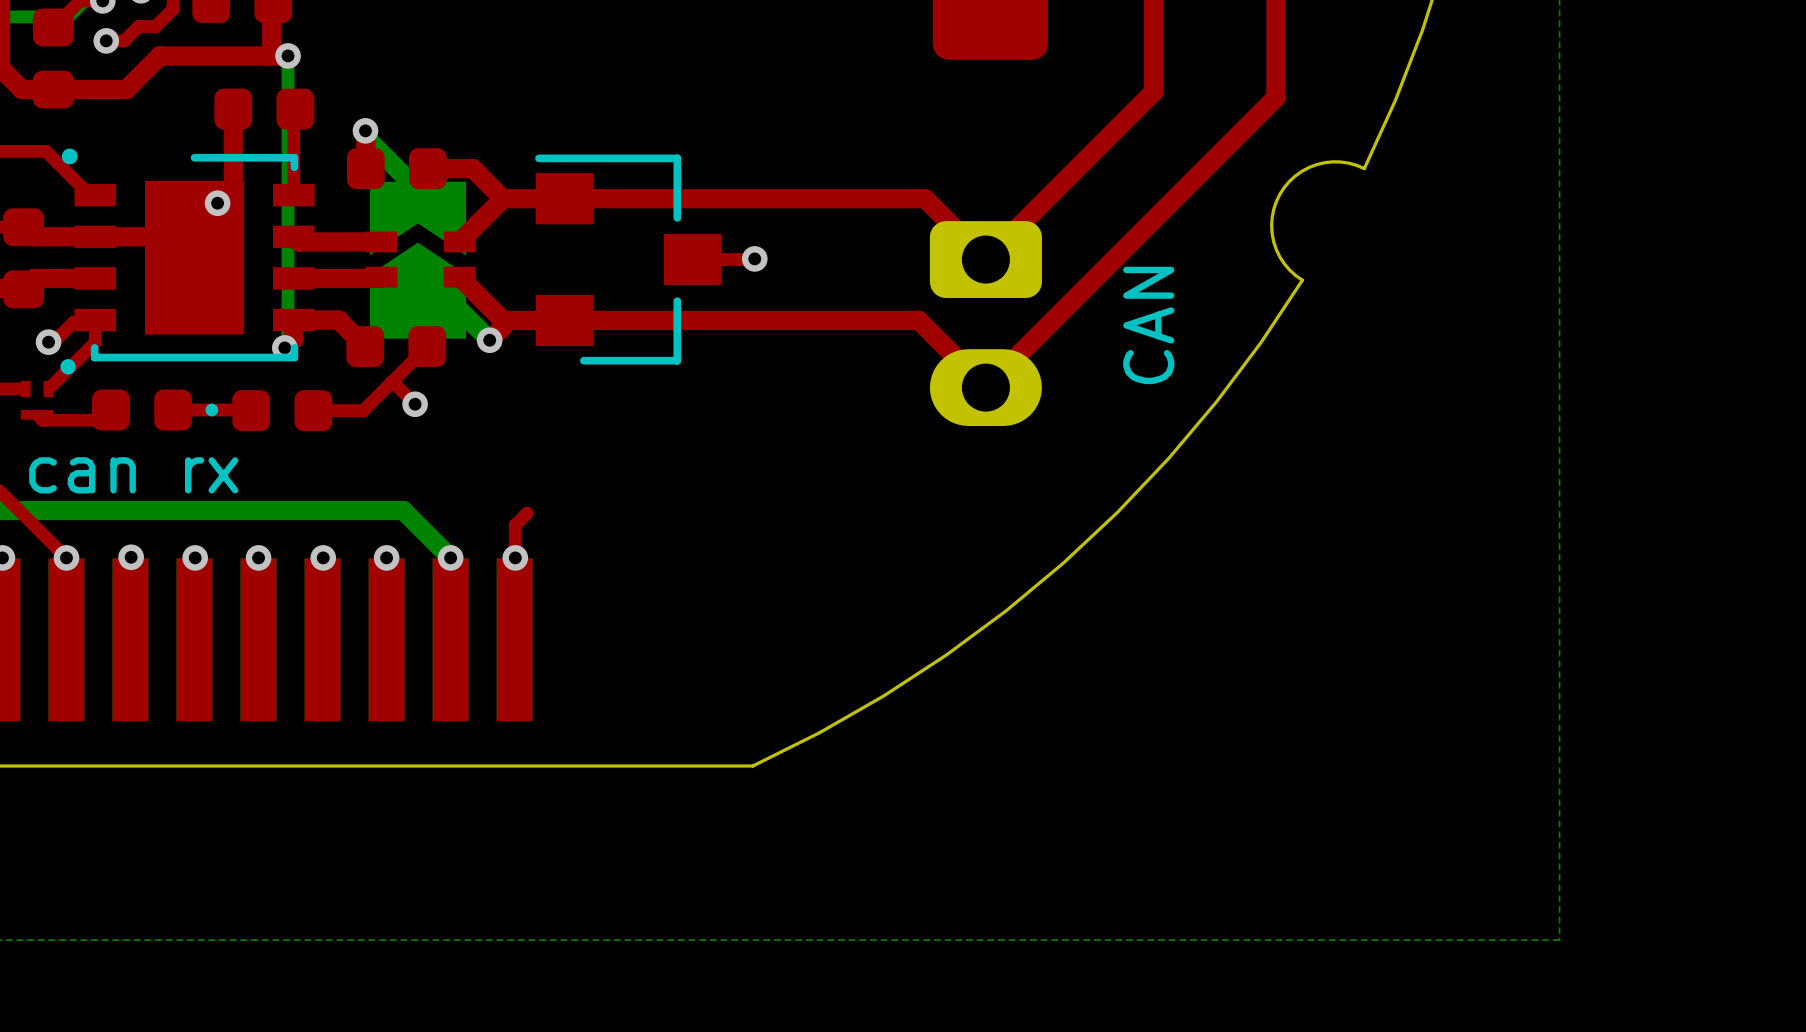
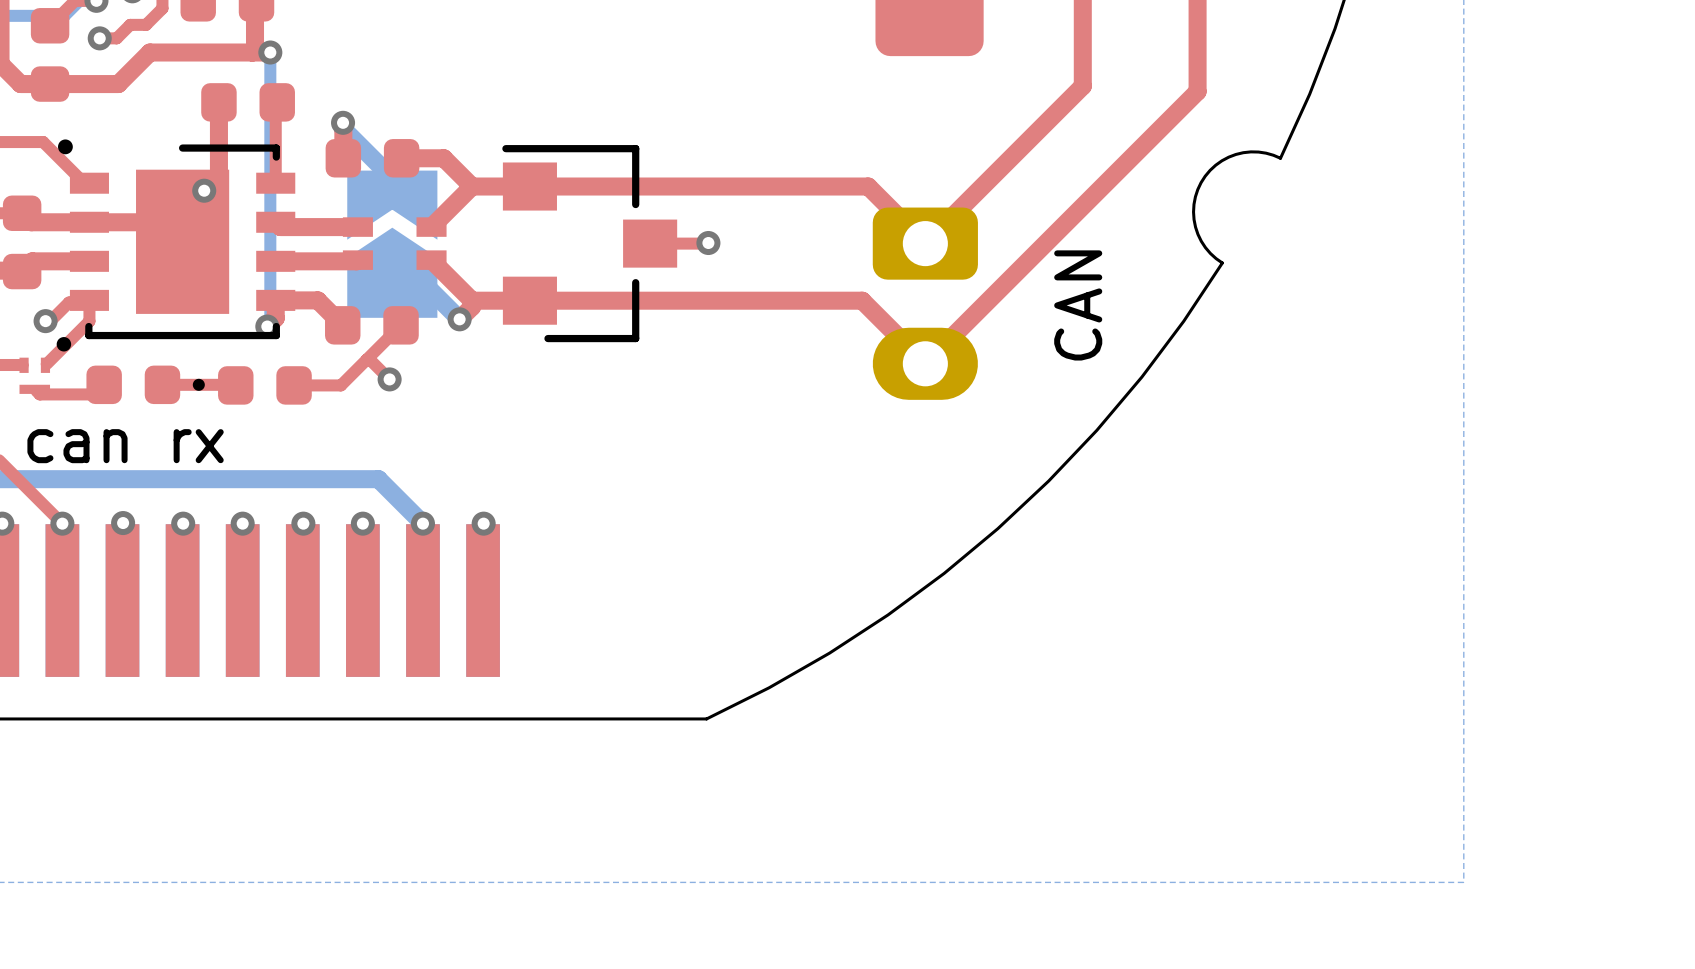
top track: (527, 513) (515, 524) (515, 557) -> none

